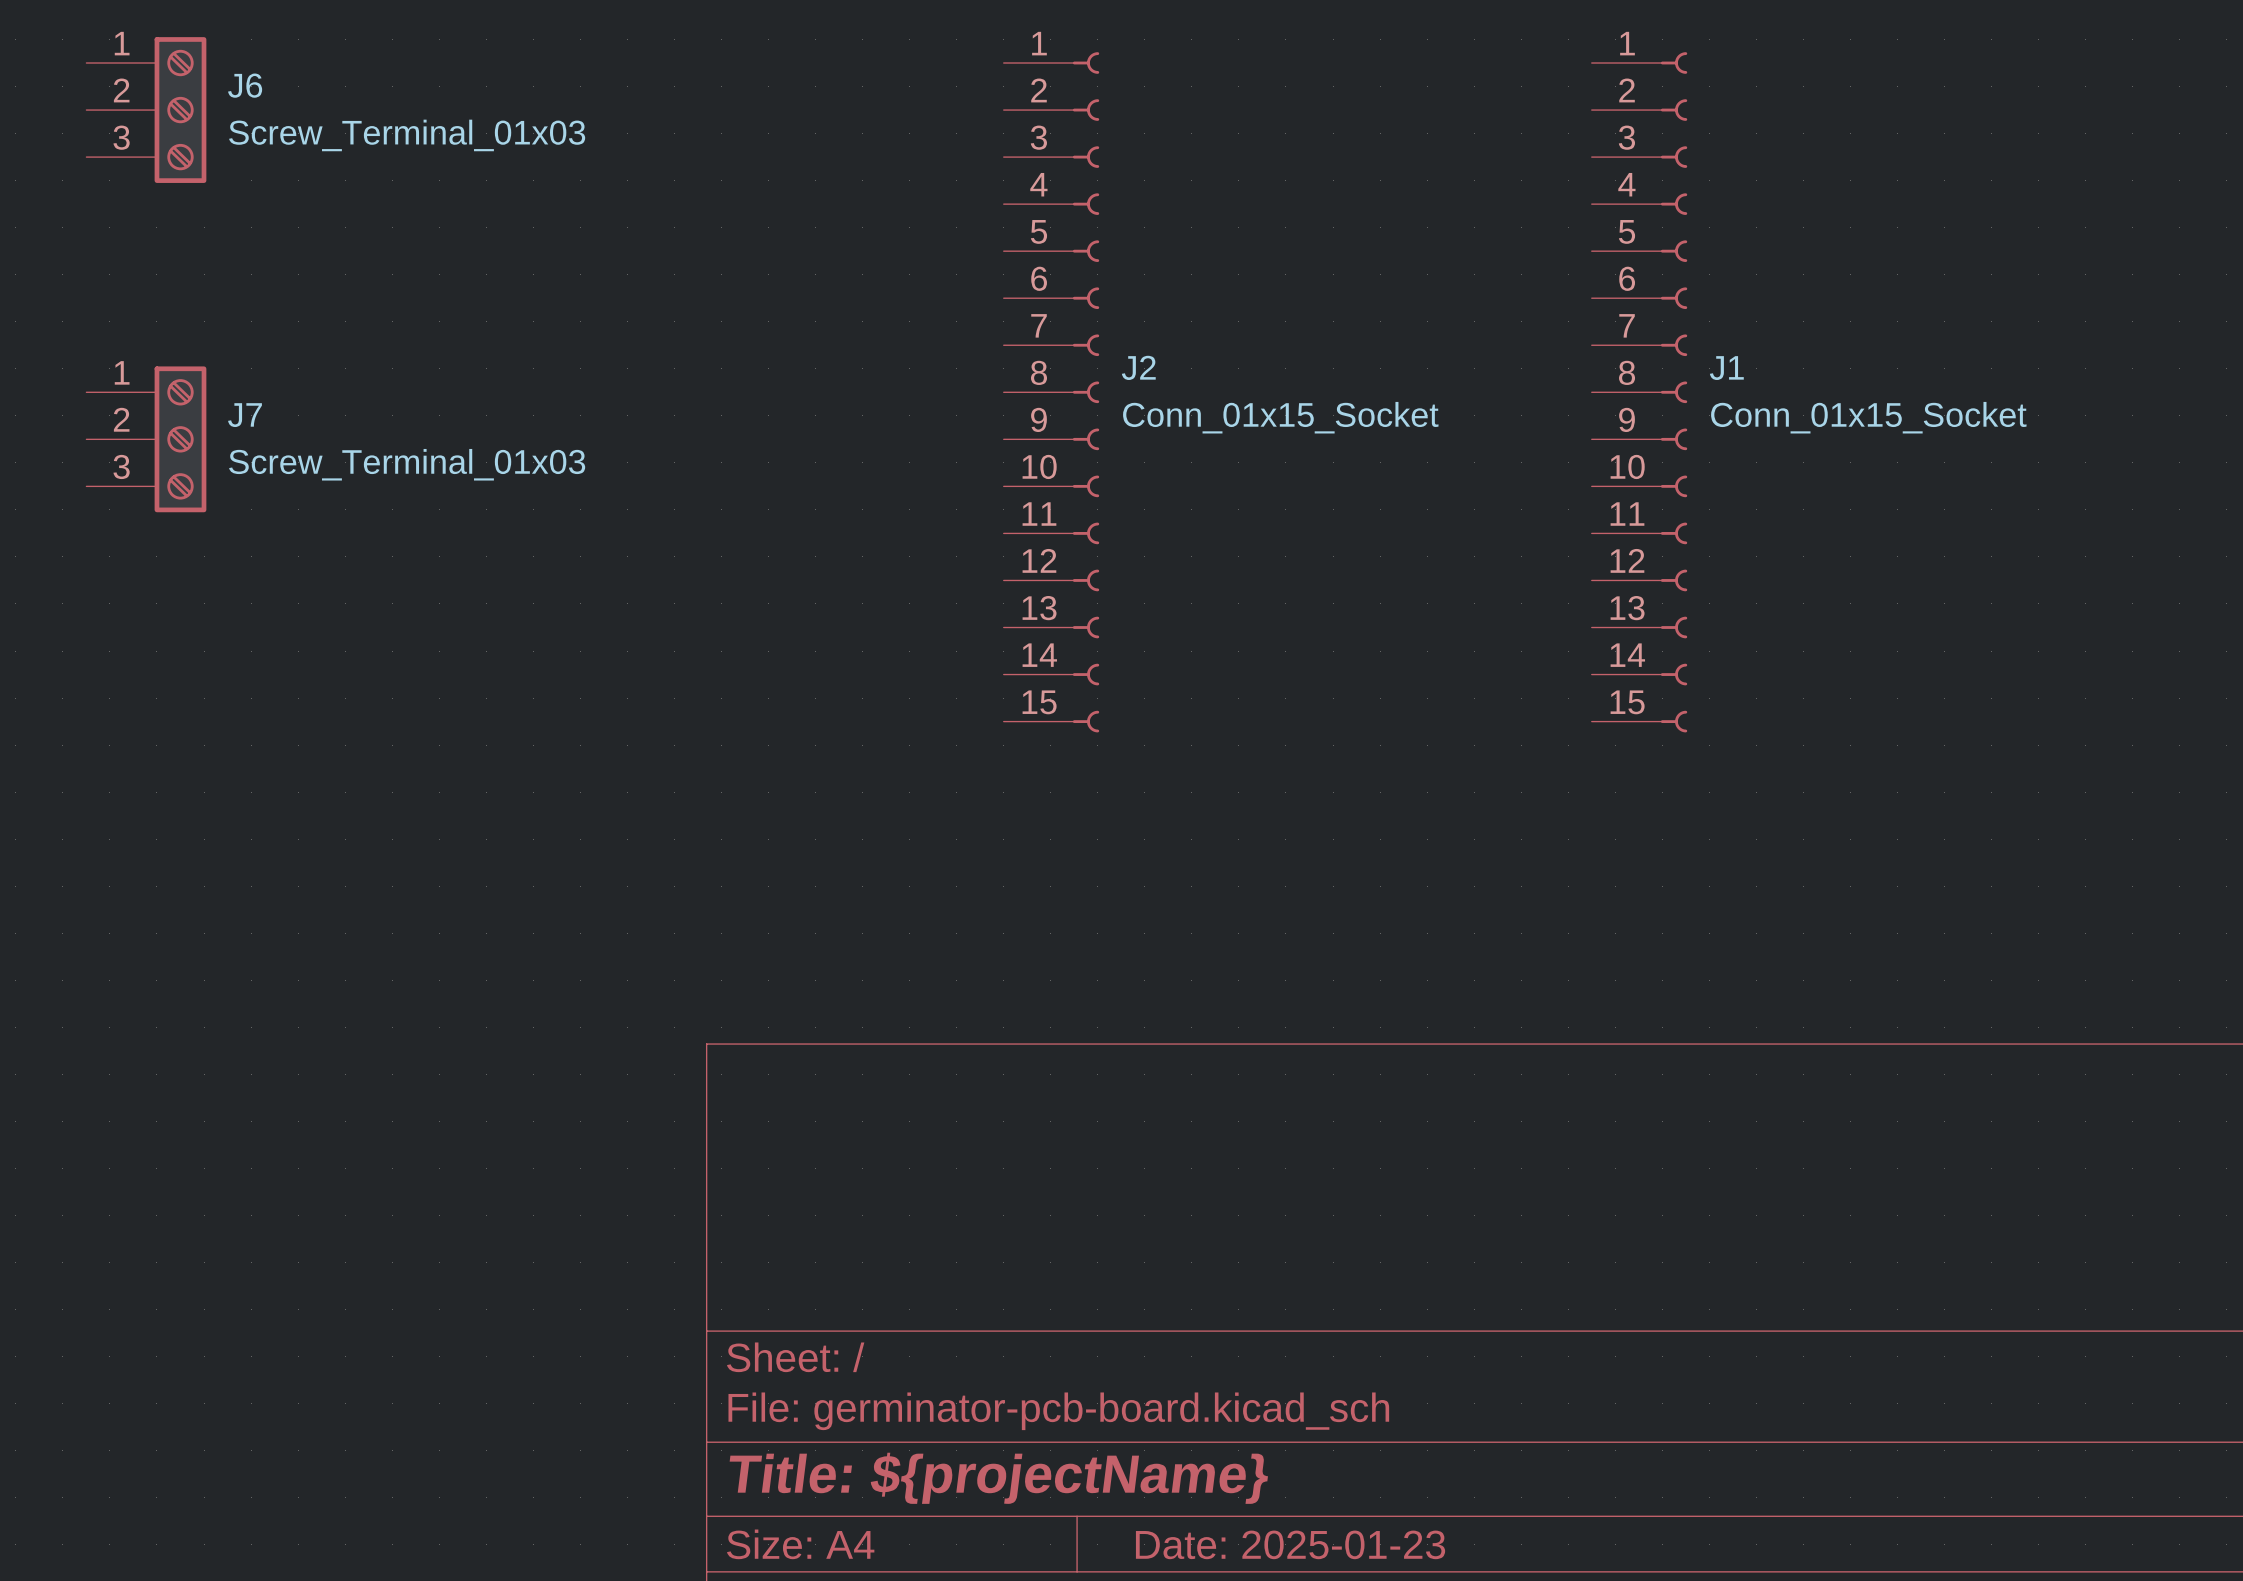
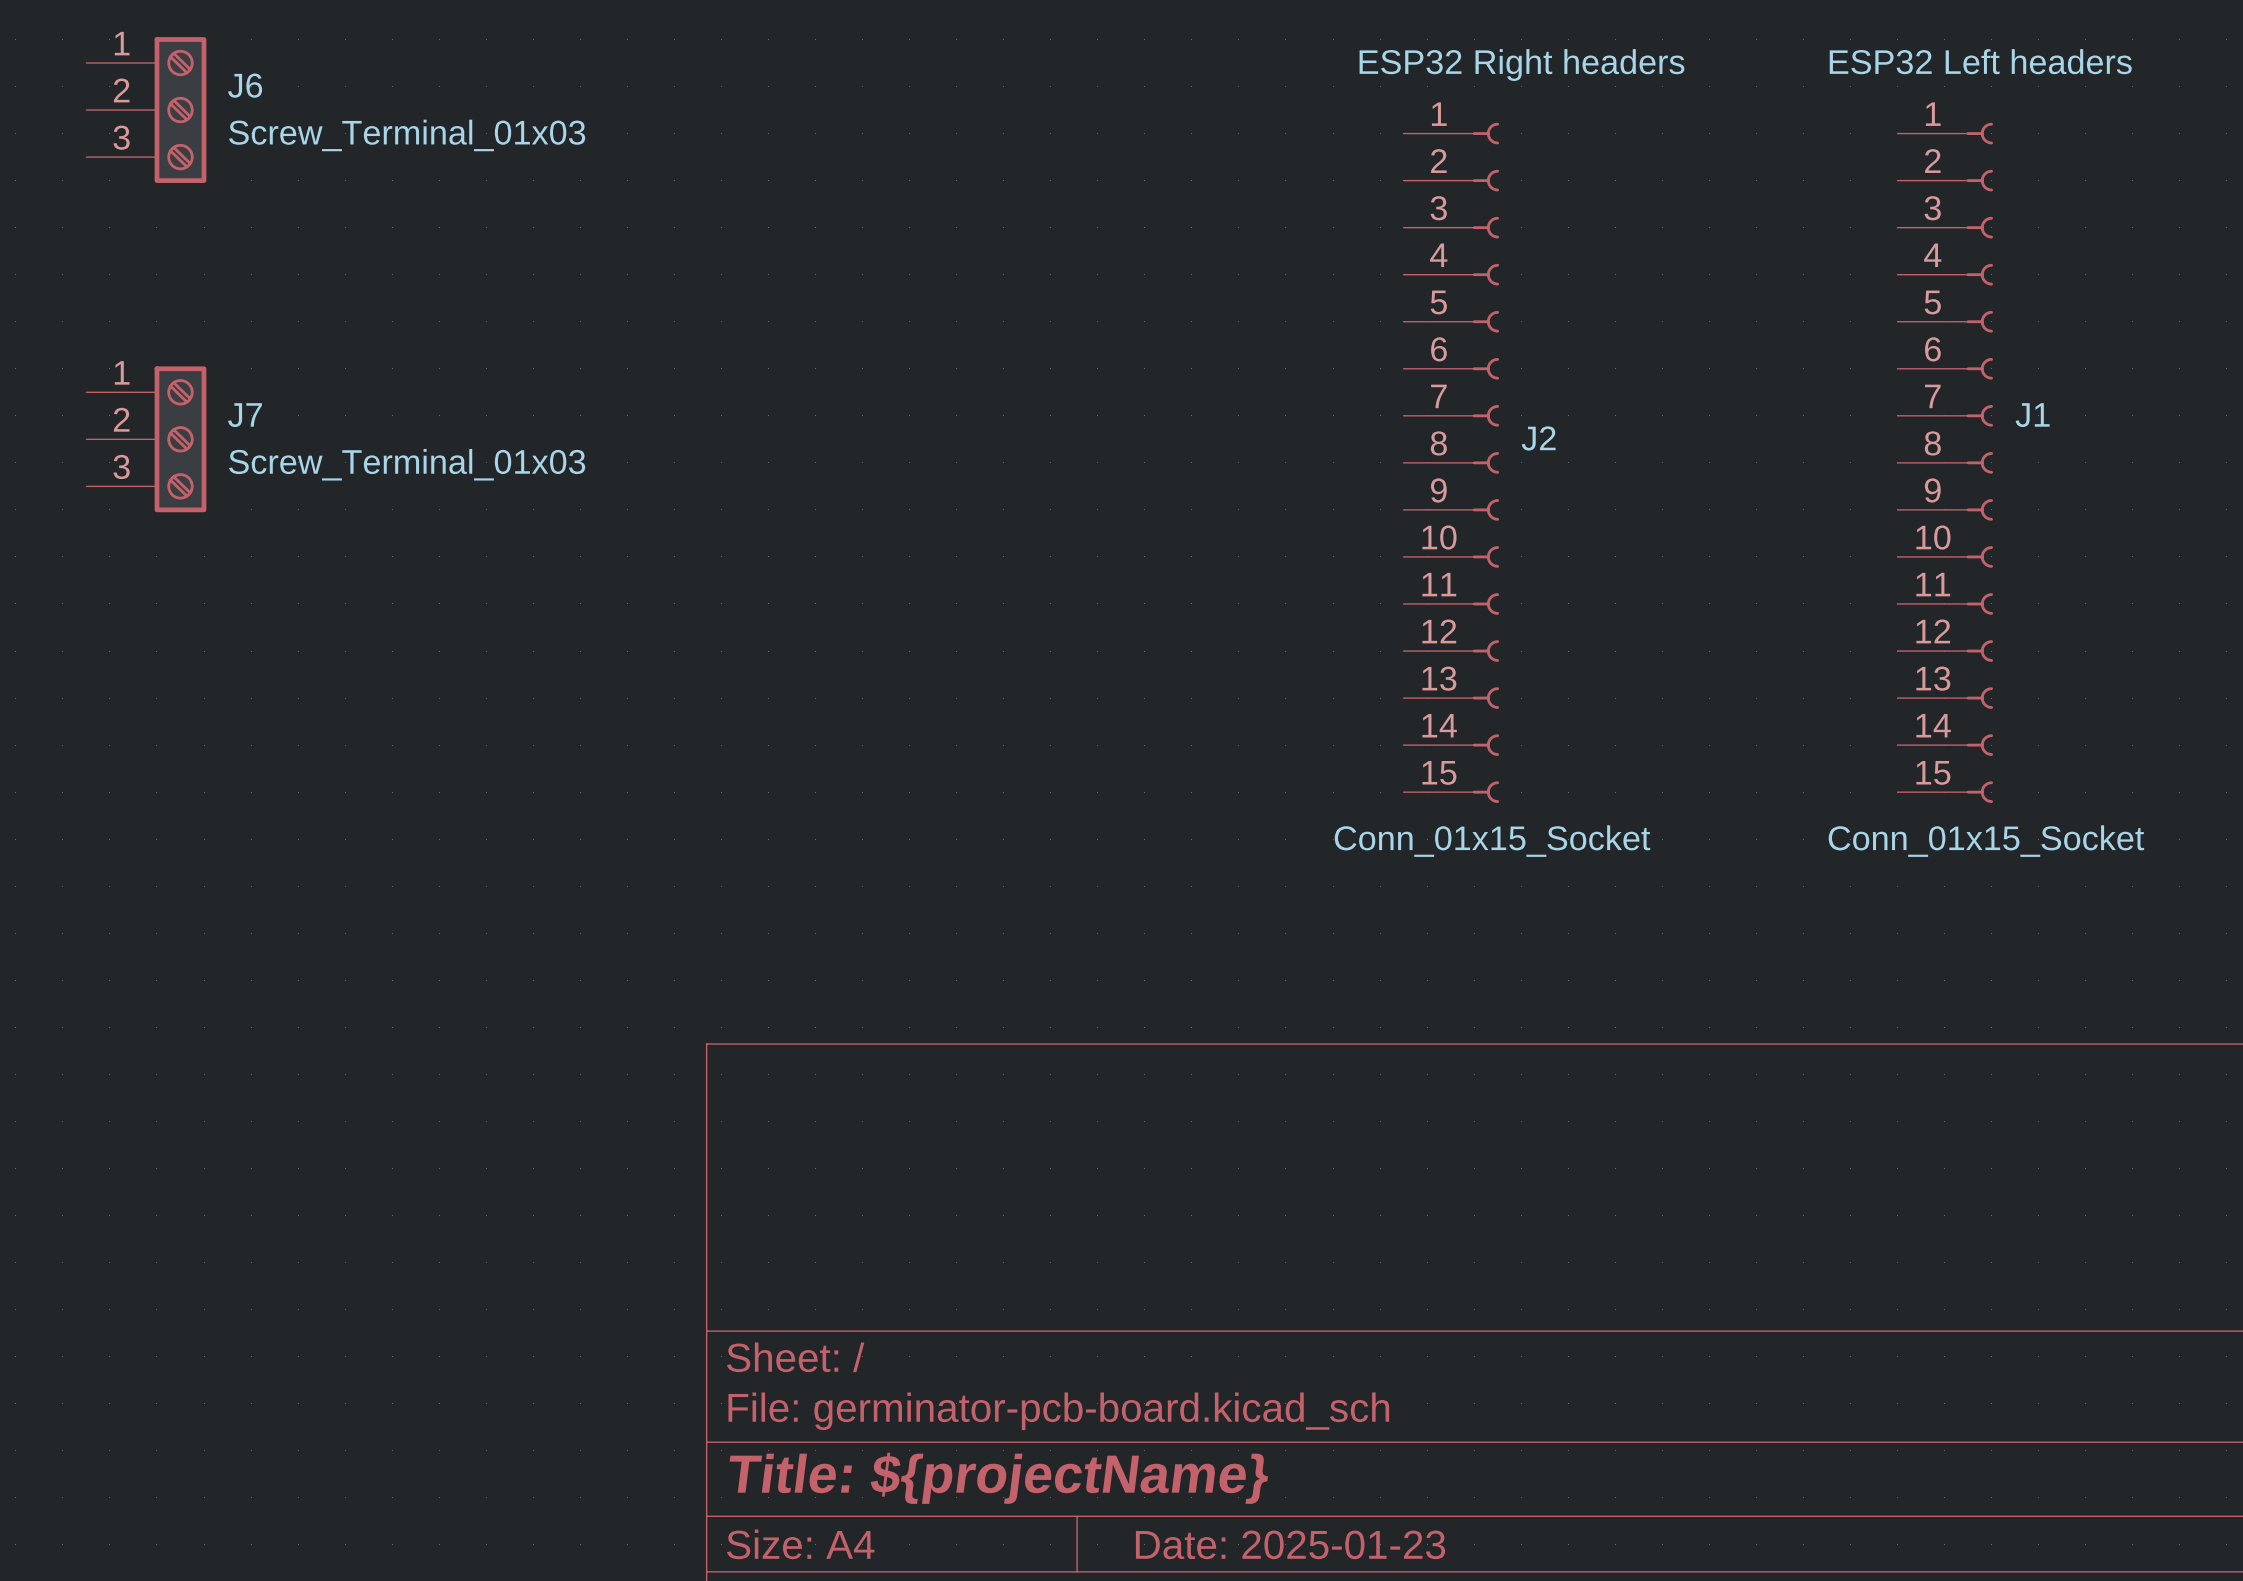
J1 text: none -> ESP32 Left headers (1980, 61)
J2 text: none -> ESP32 Right headers (1521, 65)
J1 name position: J1 (1726, 368) -> J1 (2032, 415)
J2 position: (1051, 392) -> (1451, 462)
J1 position: (1639, 392) -> (1945, 462)
J2 value position: Conn_01x15_Socket (1280, 417) -> Conn_01x15_Socket (1492, 841)
J1 value position: Conn_01x15_Socket (1868, 417) -> Conn_01x15_Socket (1986, 841)

